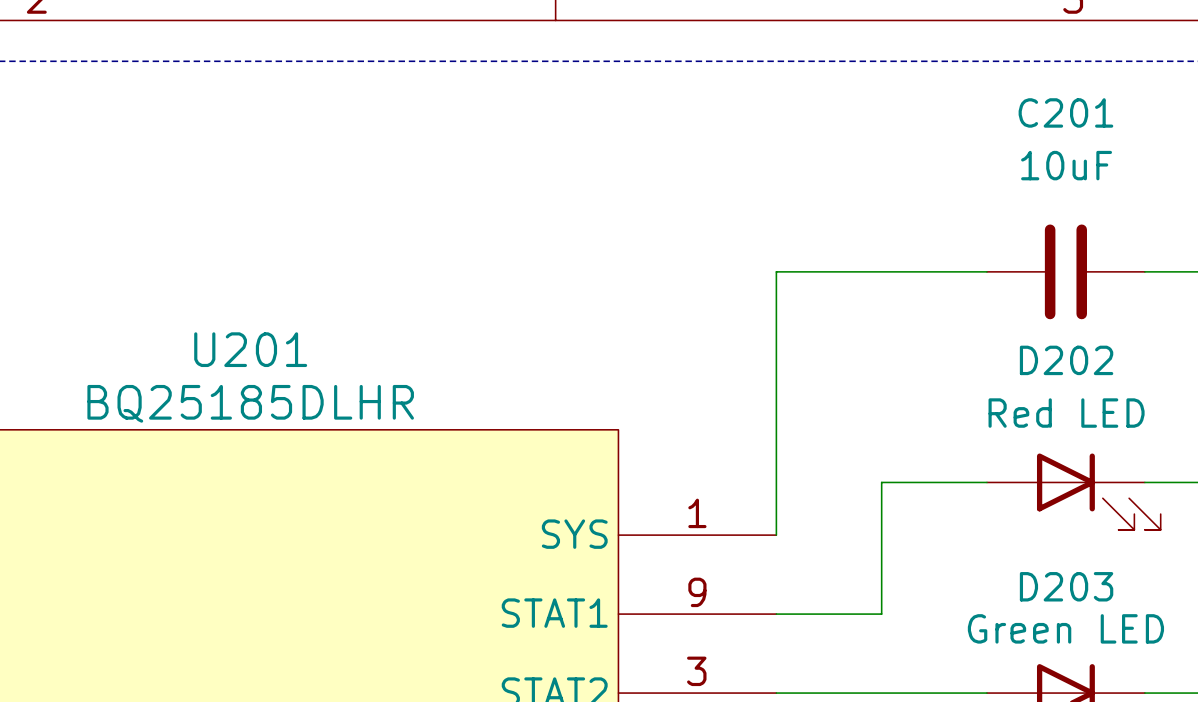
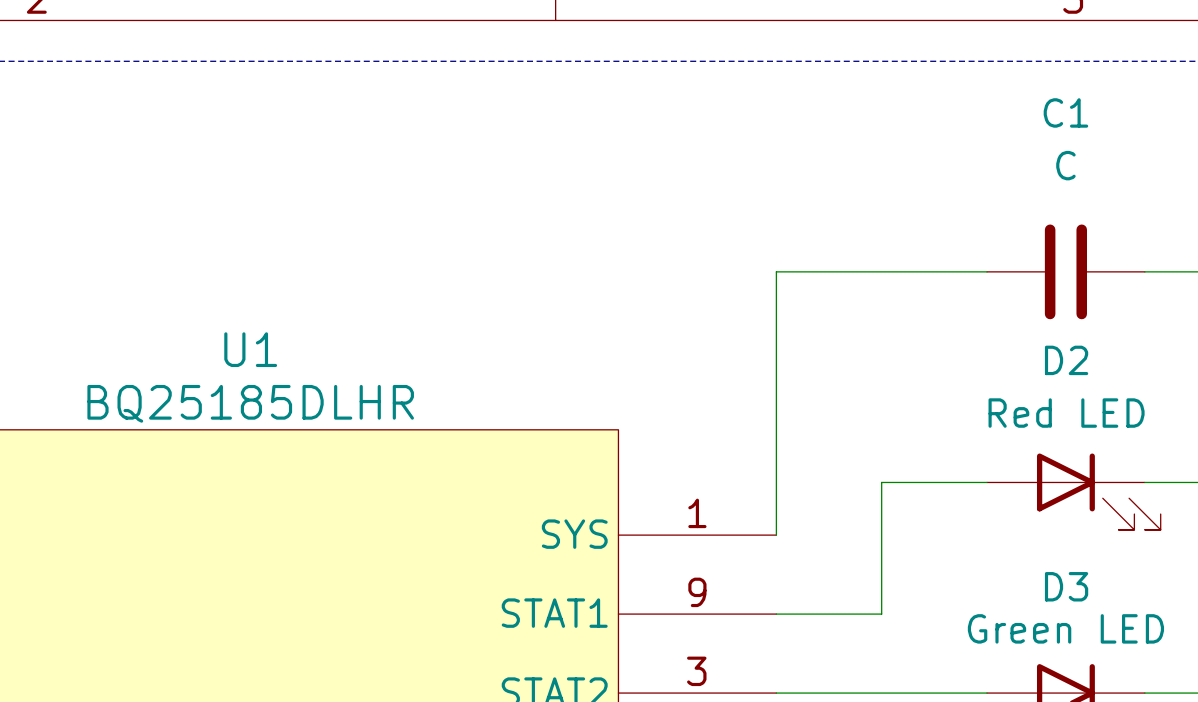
C201 name: C201 (1065, 112) -> C1 (1065, 112)
C201 value: 10uF (1066, 165) -> C (1065, 165)
U201 name: U201 (250, 349) -> U1 (250, 349)
D202 name: D202 (1066, 360) -> D2 (1066, 360)
D203 name: D203 (1066, 586) -> D3 (1066, 586)

